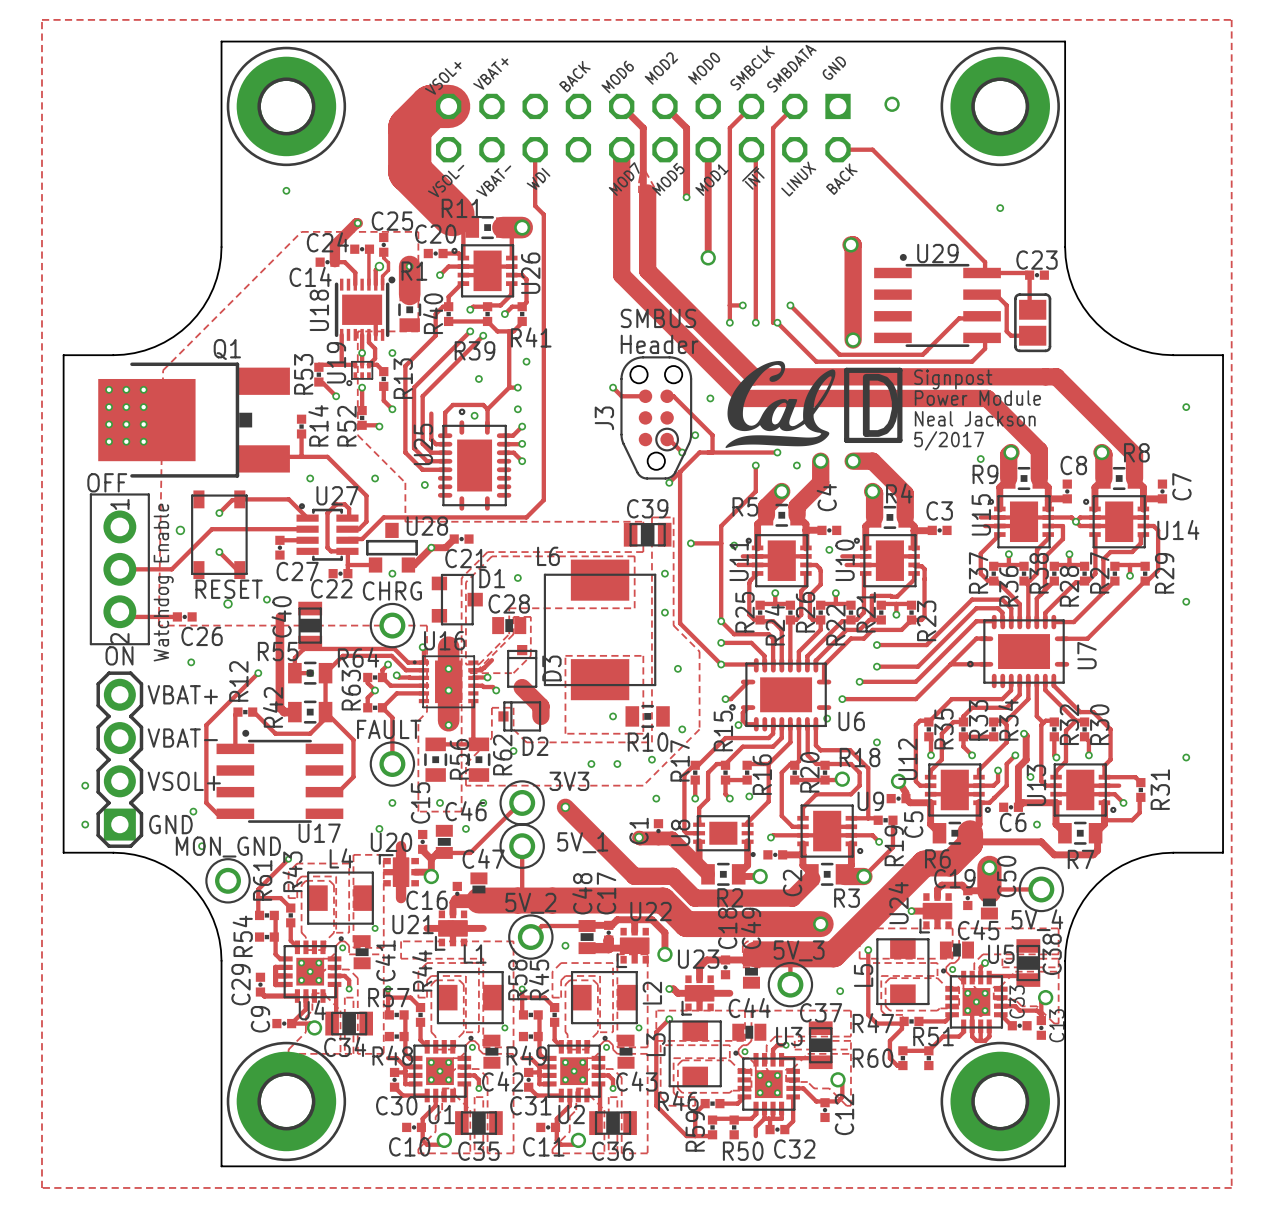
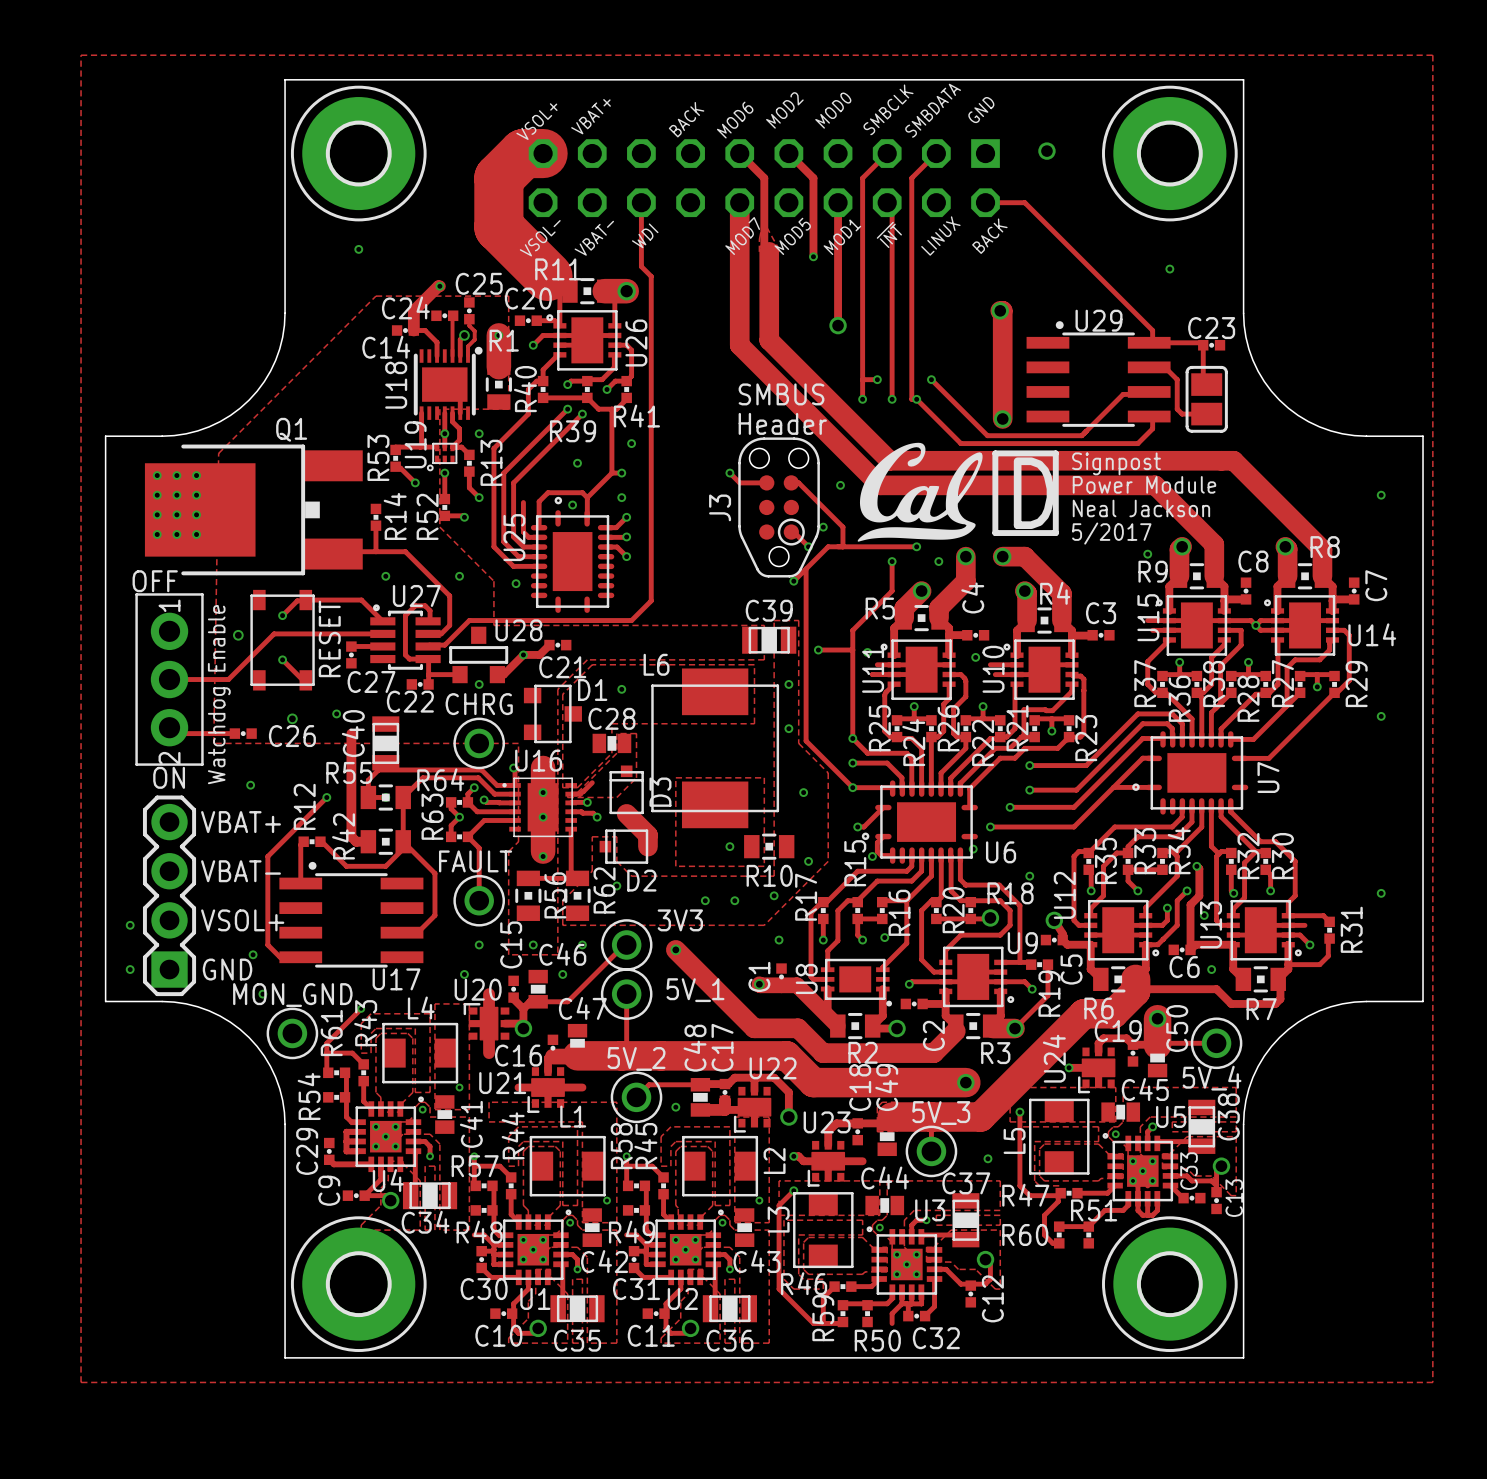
RESET name rotation: 0° (229, 589) -> 90° counterclockwise (329, 638)
C26 name position: C26 (202, 636) -> C26 (292, 736)

